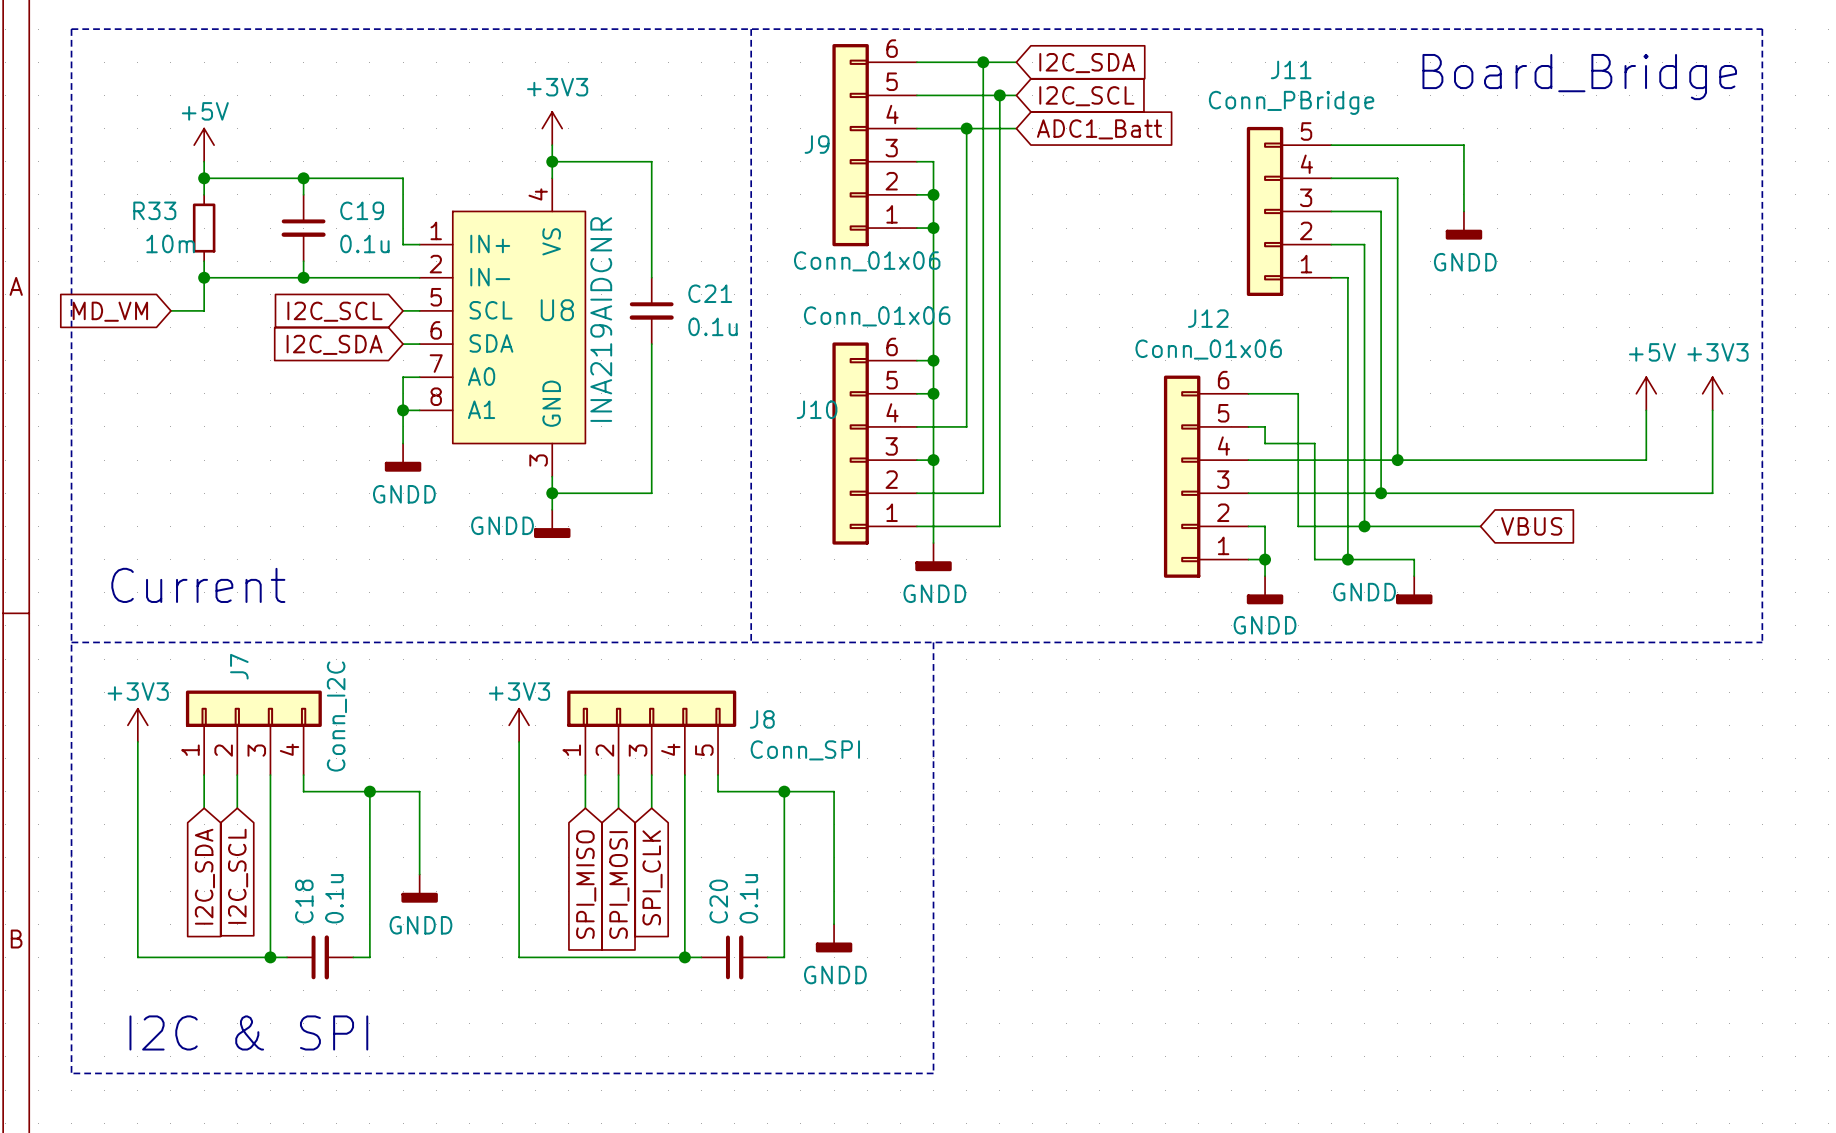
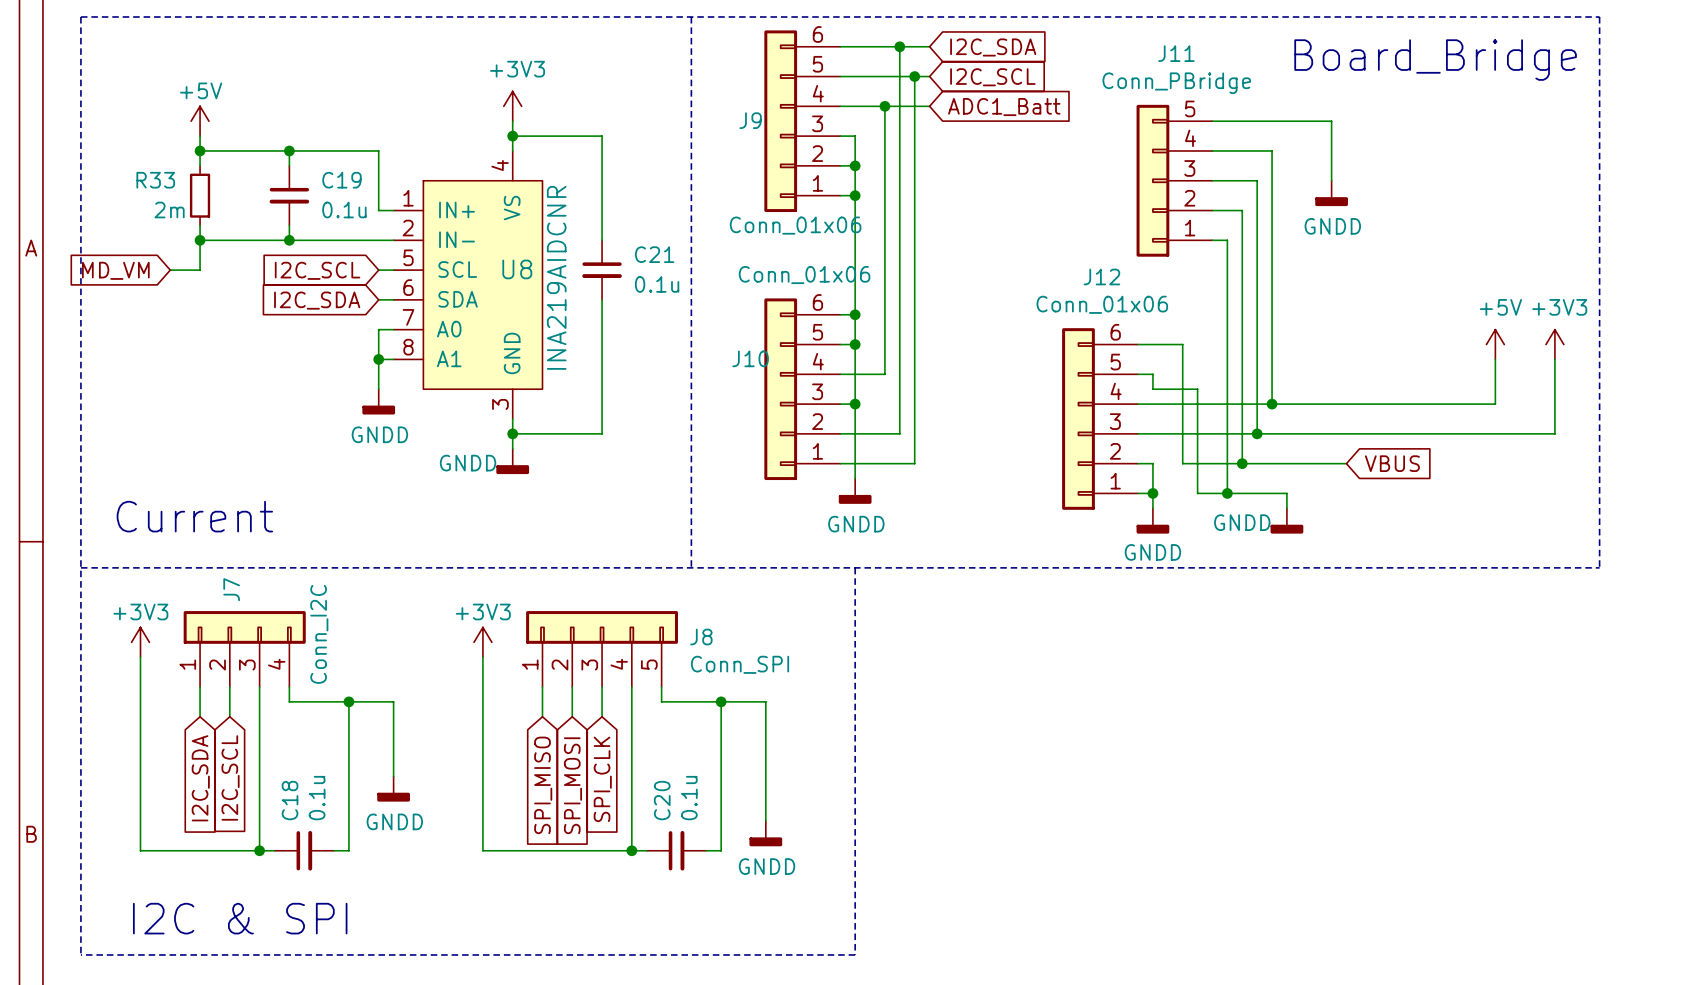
R33 value: 10m (170, 243) -> 2m (169, 209)

